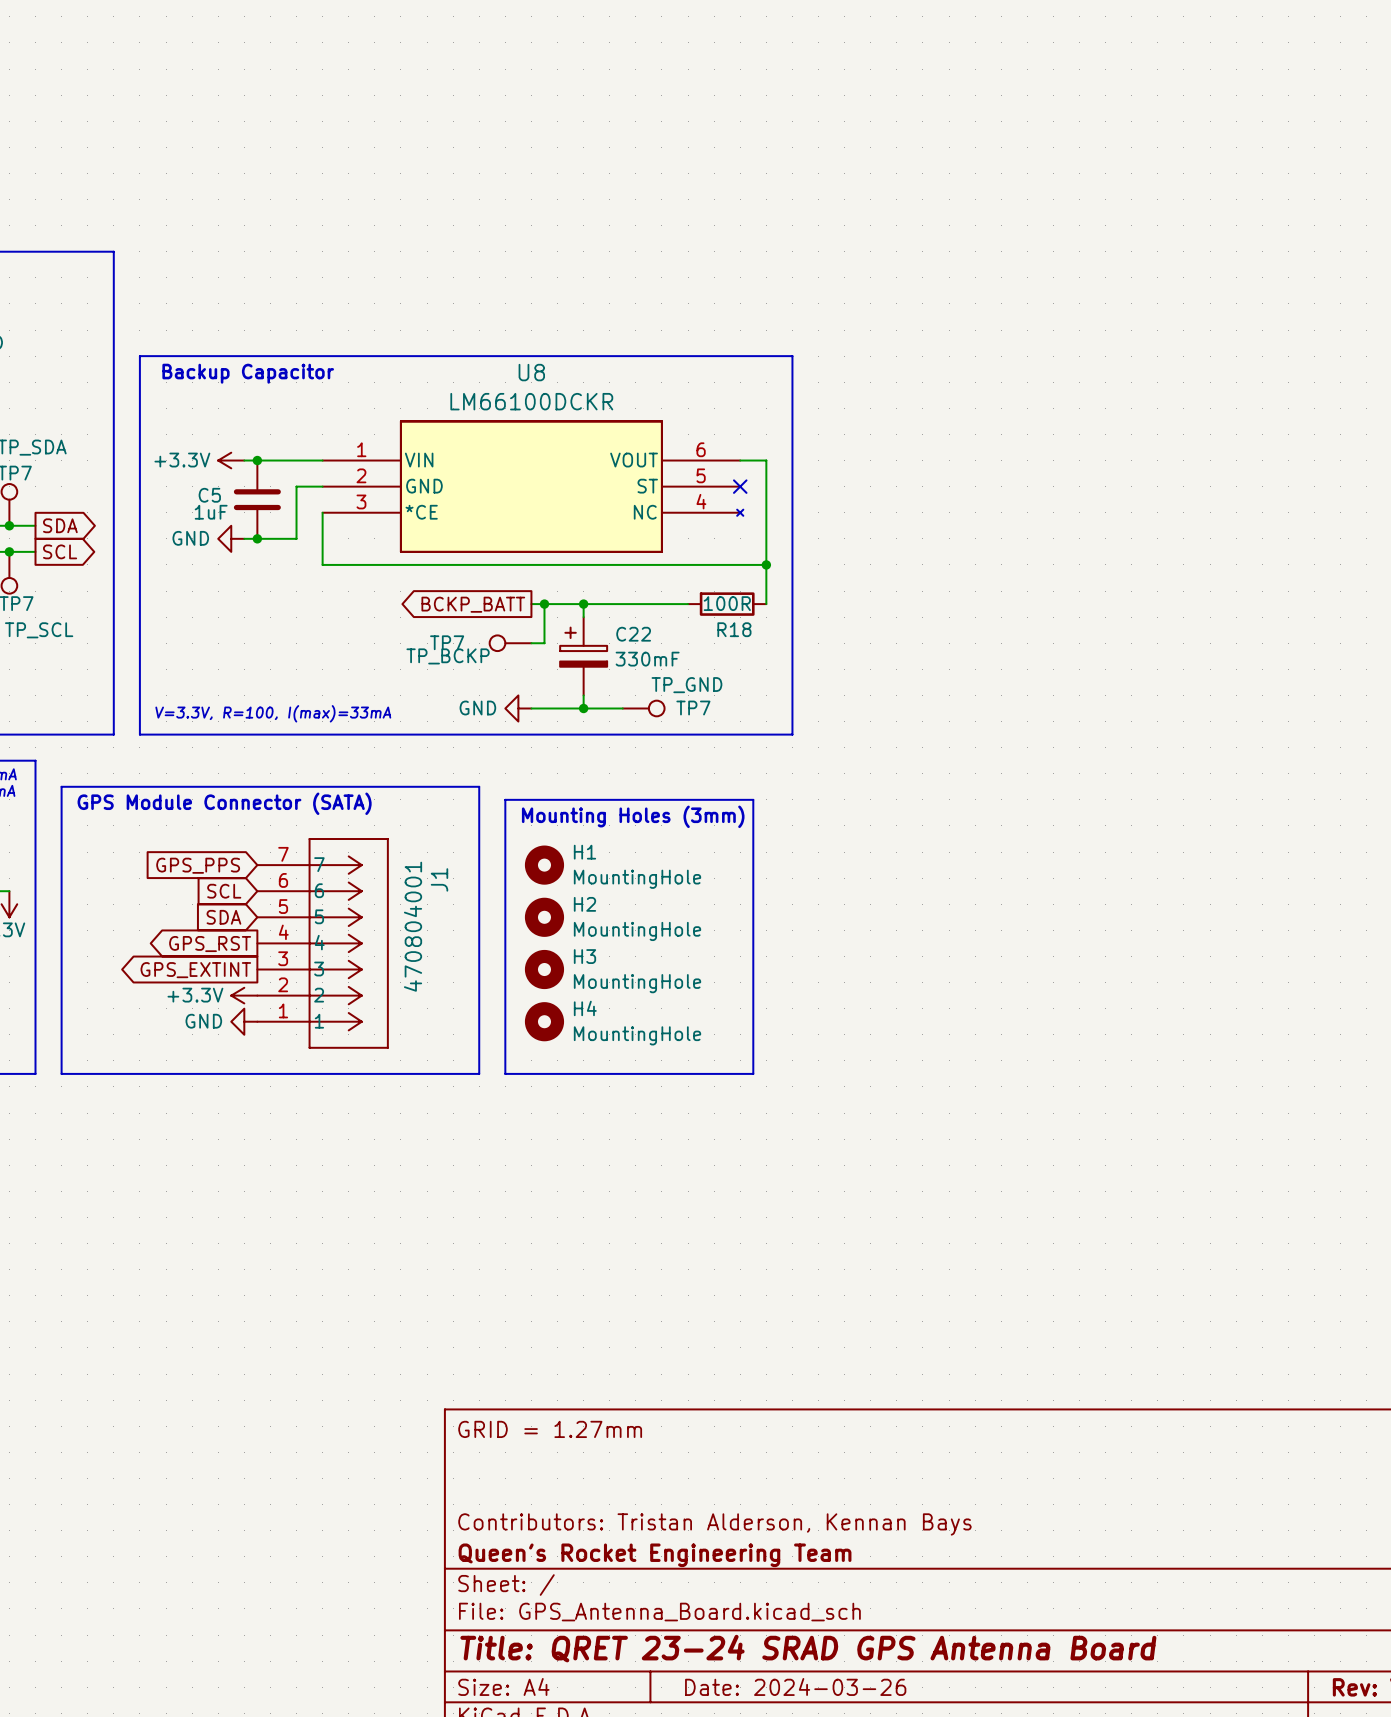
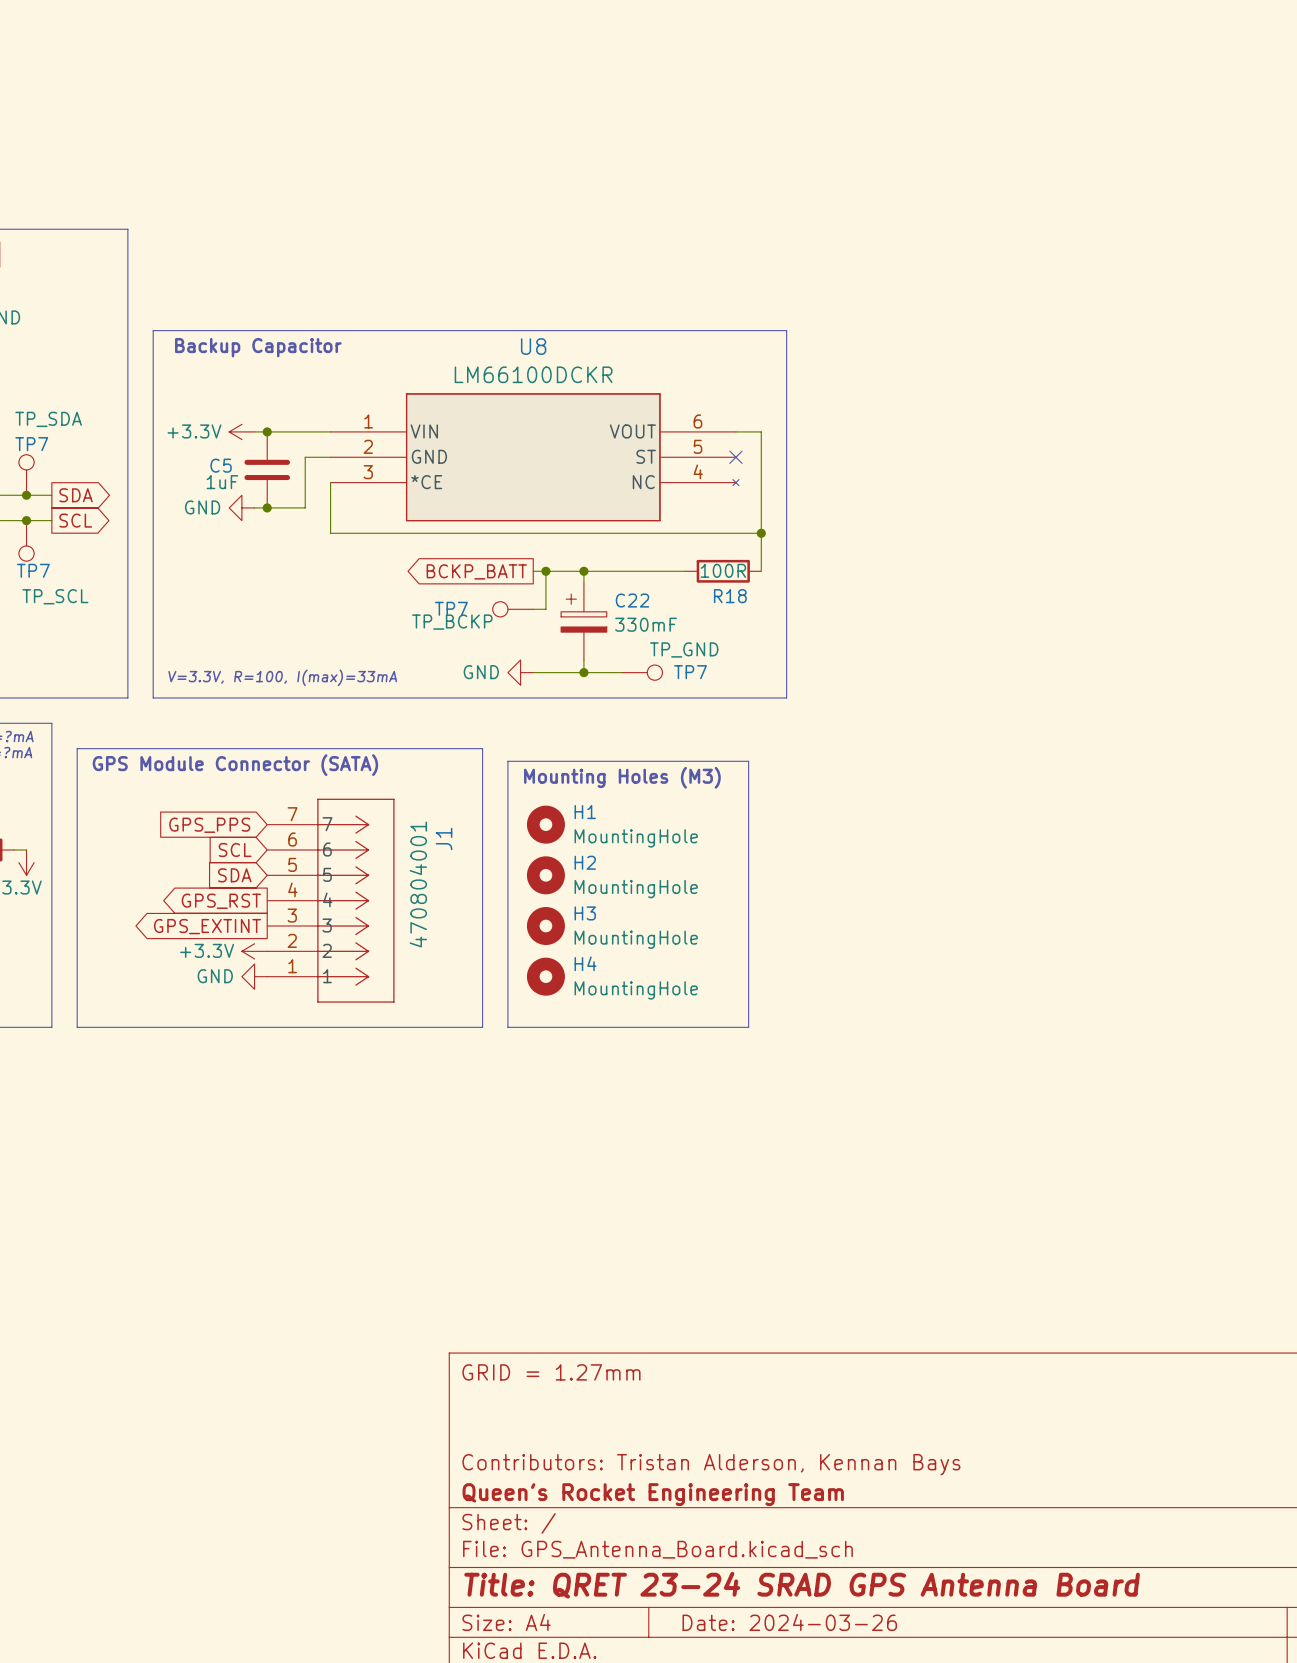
text: Mounting Holes (3mm) (633, 816) -> Mounting Holes (M3) (622, 777)

